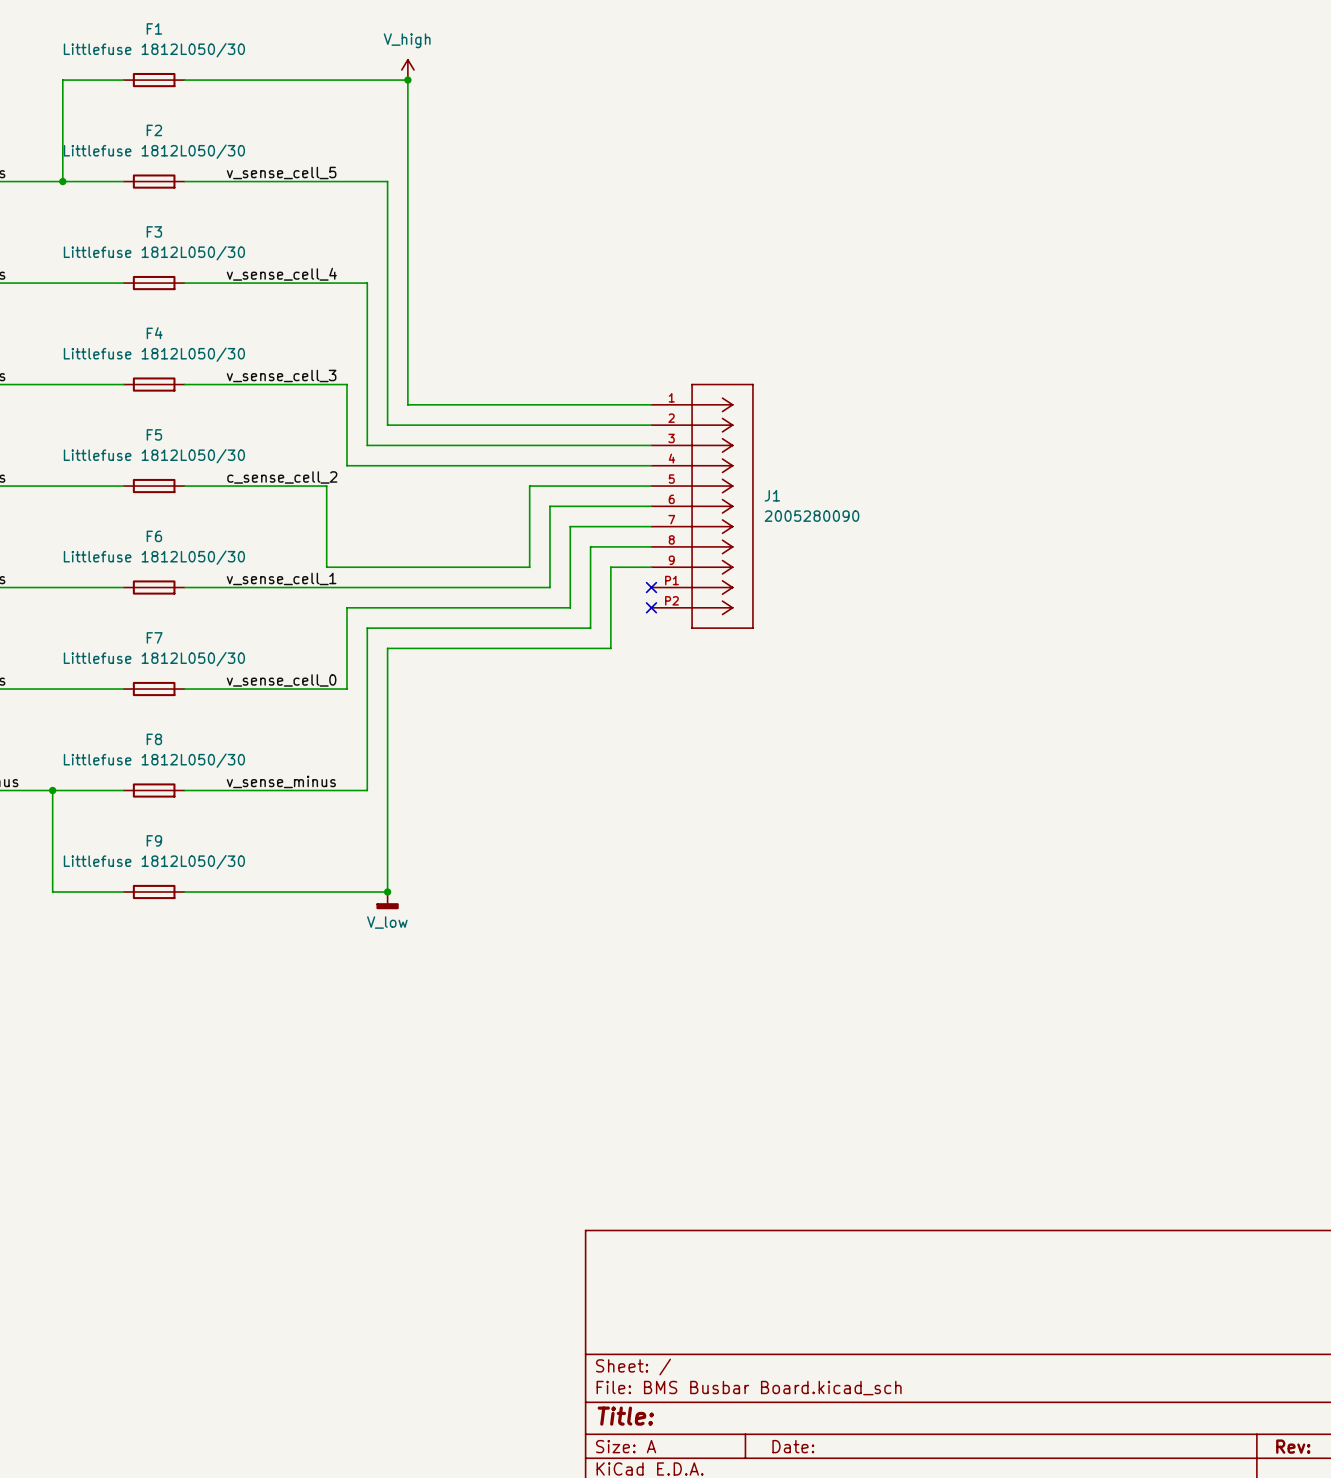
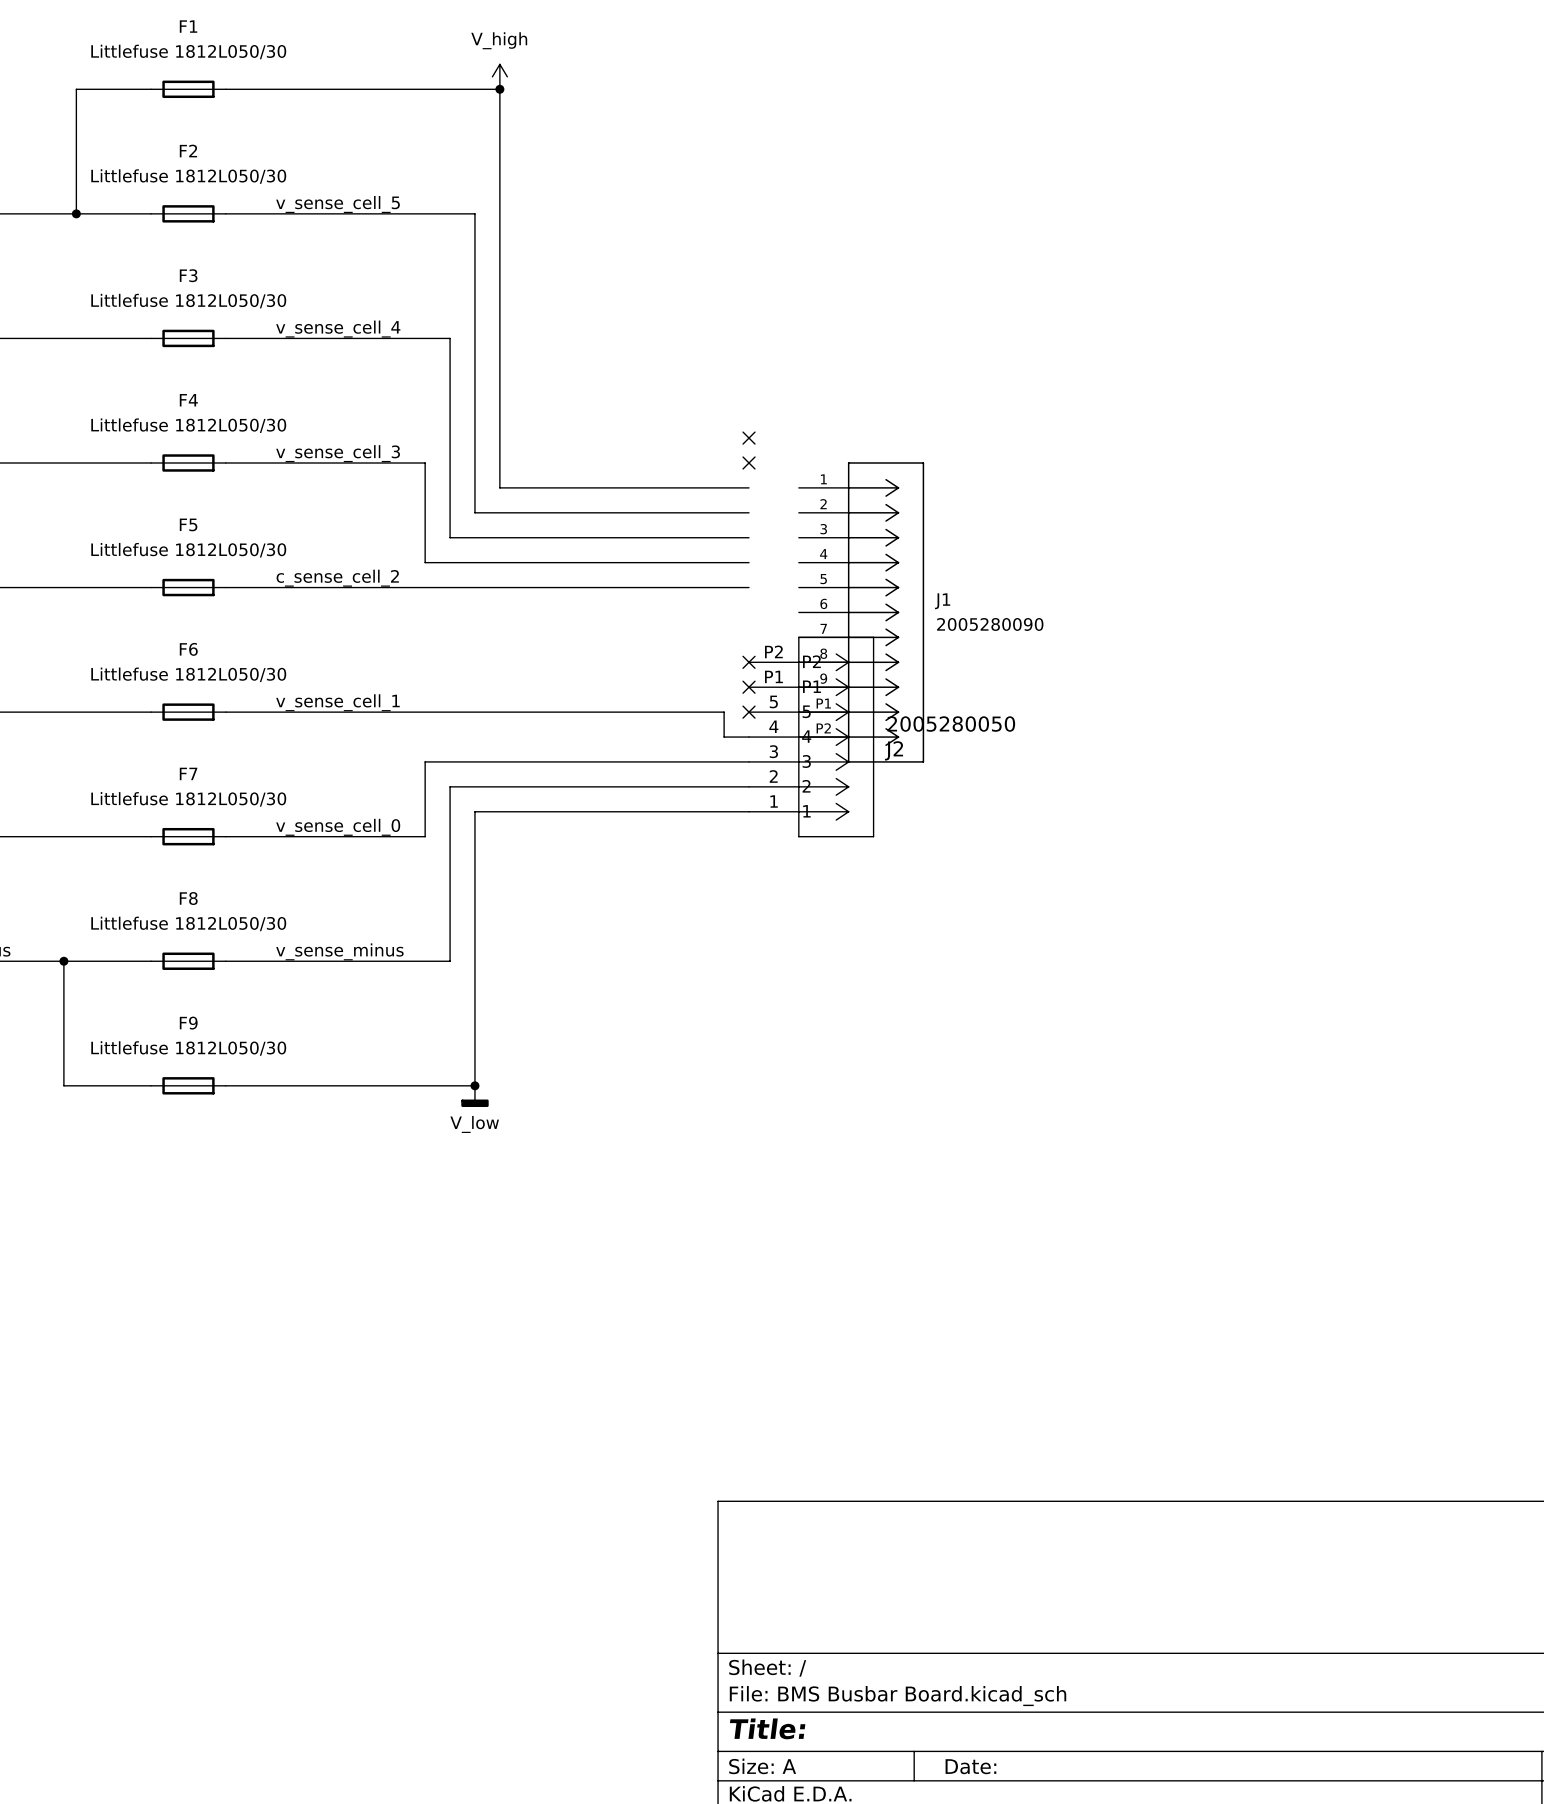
no-connect mark: none -> (749, 438)
no-connect mark: none -> (749, 462)
wire: (610, 404) (651, 404) -> none
wire: (610, 425) (651, 425) -> none
wire: (610, 445) (651, 445) -> none
wire: (610, 465) (651, 465) -> none
wire: (326, 486) (326, 567) (529, 567) (529, 486) -> (400, 587) (649, 587)
wire: (610, 486) (651, 486) -> none
wire: (651, 506) (549, 506) (549, 587) -> (724, 712) (674, 712)
wire: (651, 526) (570, 526) (570, 607) (346, 607) (346, 628) -> none
no-connect mark: none -> (749, 662)
wire: (651, 546) (590, 546) (590, 587) -> none
no-connect mark: none -> (749, 687)
wire: (651, 567) (610, 567) (610, 648) -> none
no-connect mark: none -> (749, 712)
no-connect mark: (651, 587) -> none
wire: (590, 607) (590, 628) -> (724, 737) (749, 737)
no-connect mark: (651, 607) -> none
J2: none -> 2005280050 (811, 737)
wire: (367, 628) (367, 648) -> (450, 761) (425, 761)
wire: none -> (724, 761) (749, 761)
wire: (387, 648) (387, 668) -> (474, 786) (450, 786)
wire: none -> (474, 811) (749, 811)

